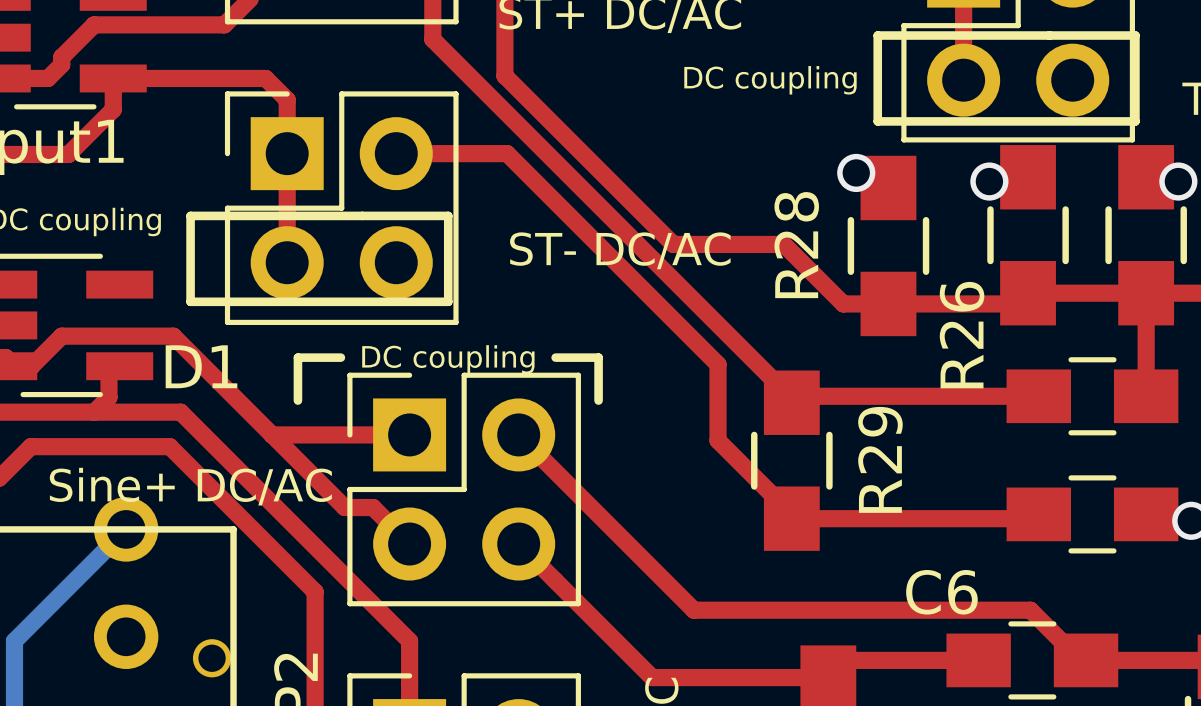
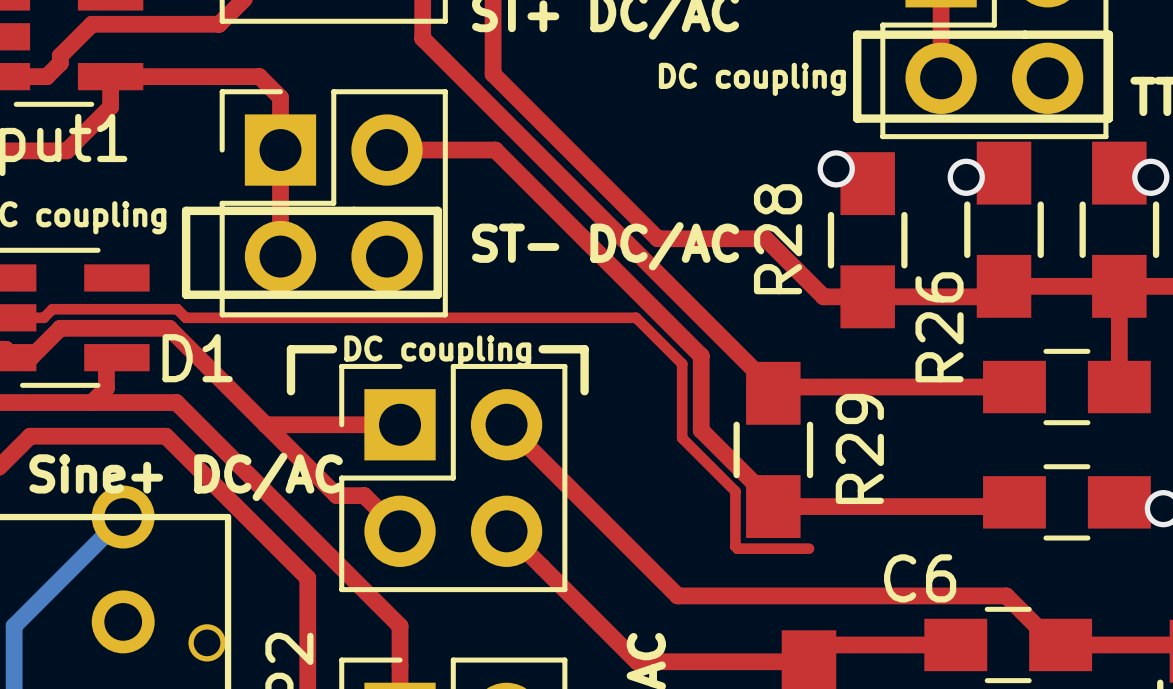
top track: none -> (14, 317) (43, 317) (52, 309) (177, 309) (185, 317) (636, 317) (682, 363) (682, 438) (735, 491) (735, 546) (737, 548) (809, 548)

